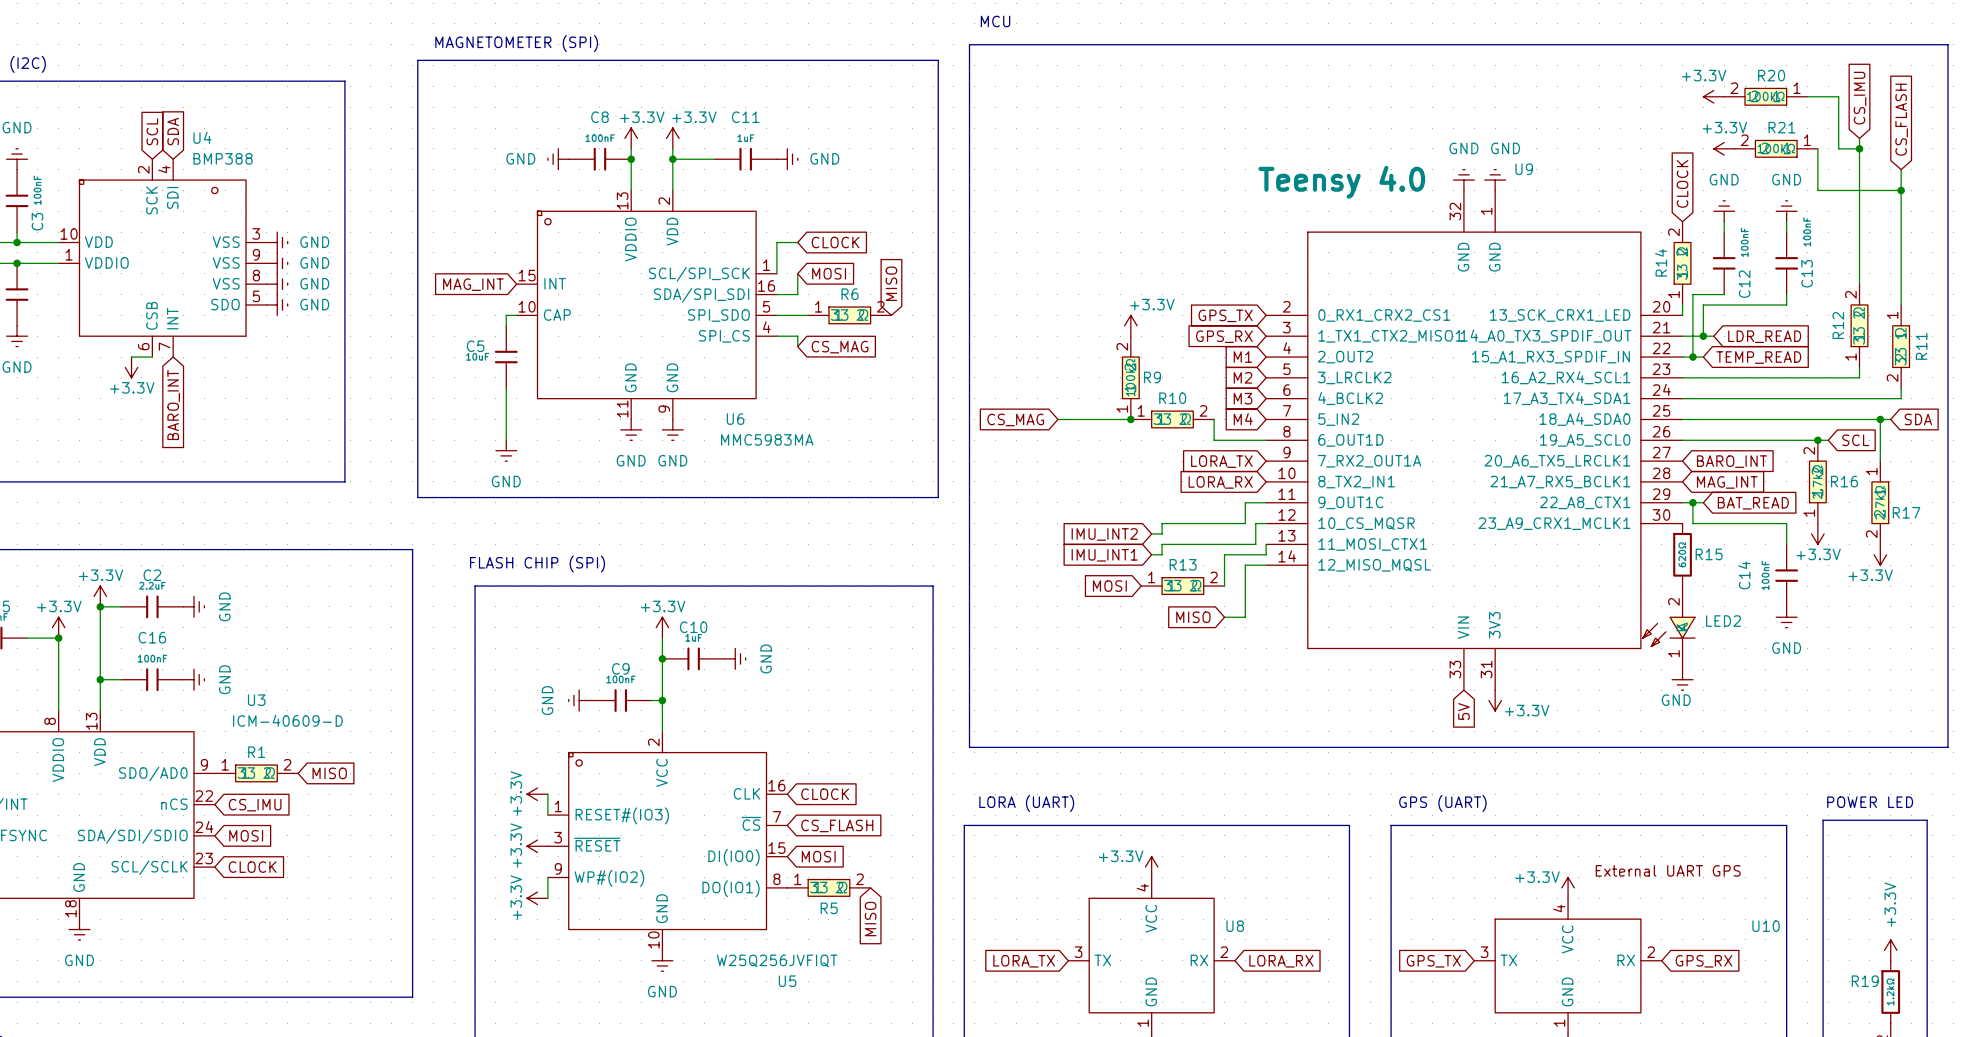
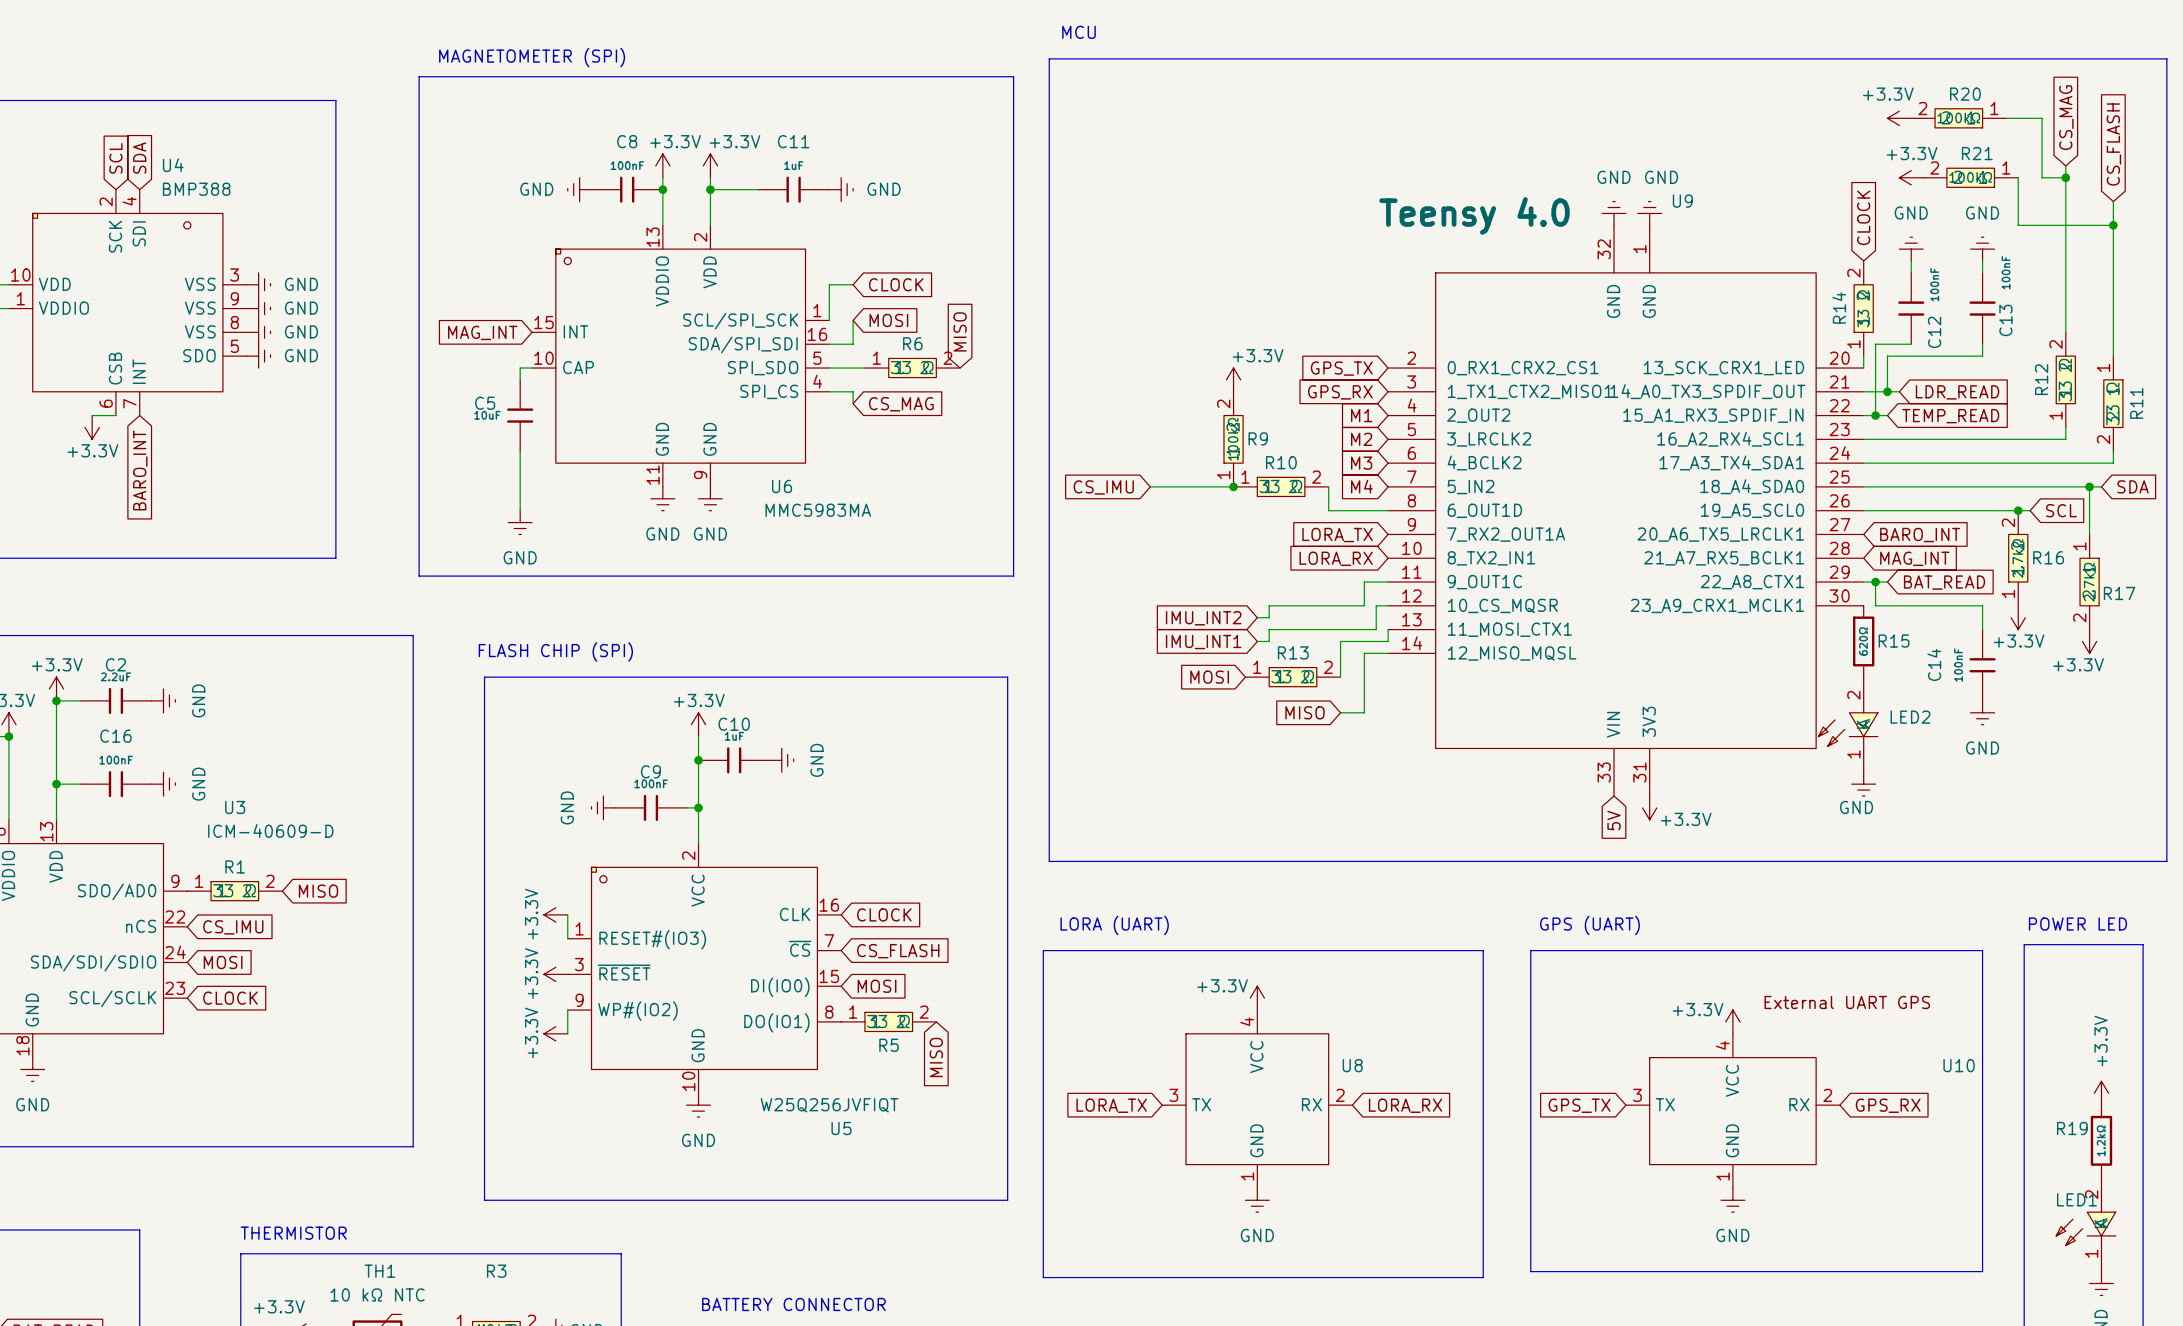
global label: CS_IMU (1860, 98) -> CS_MAG (2066, 117)
global label: CS_MAG (1015, 419) -> CS_IMU (1103, 487)

